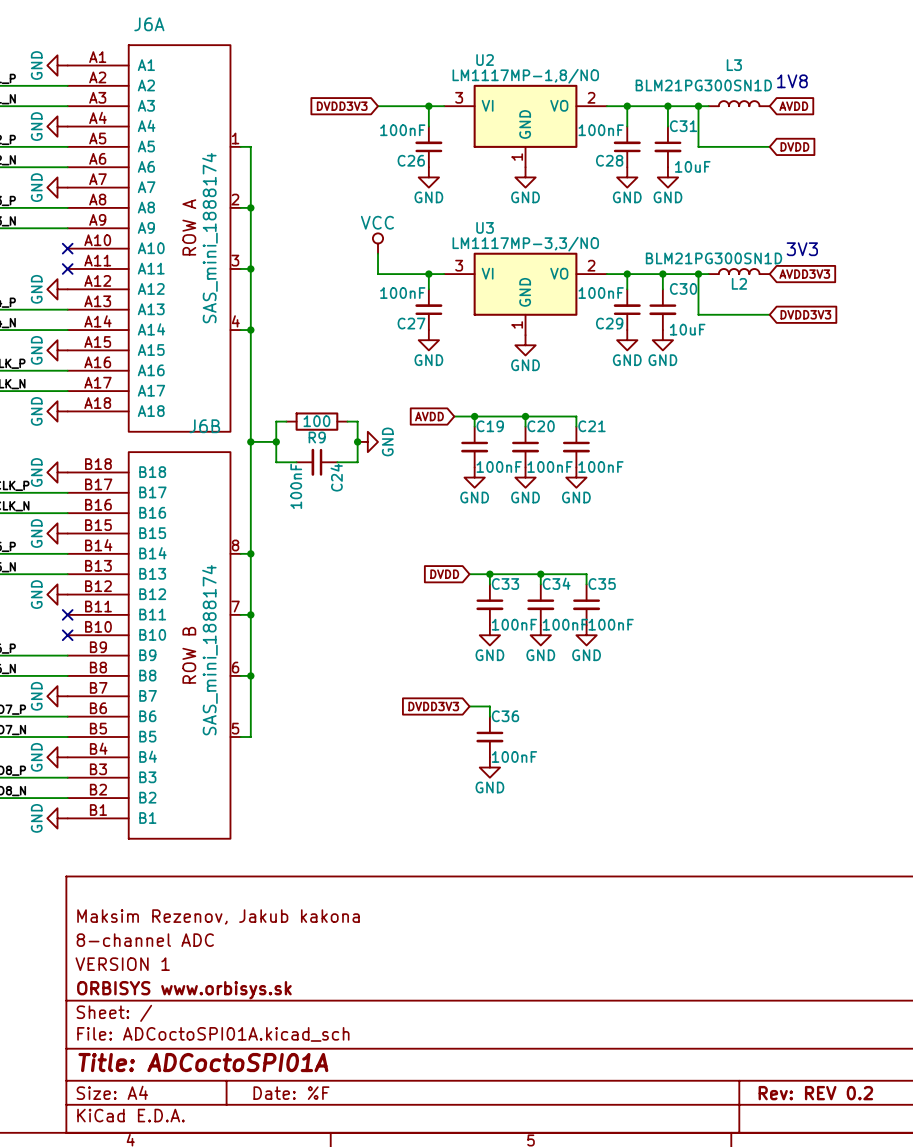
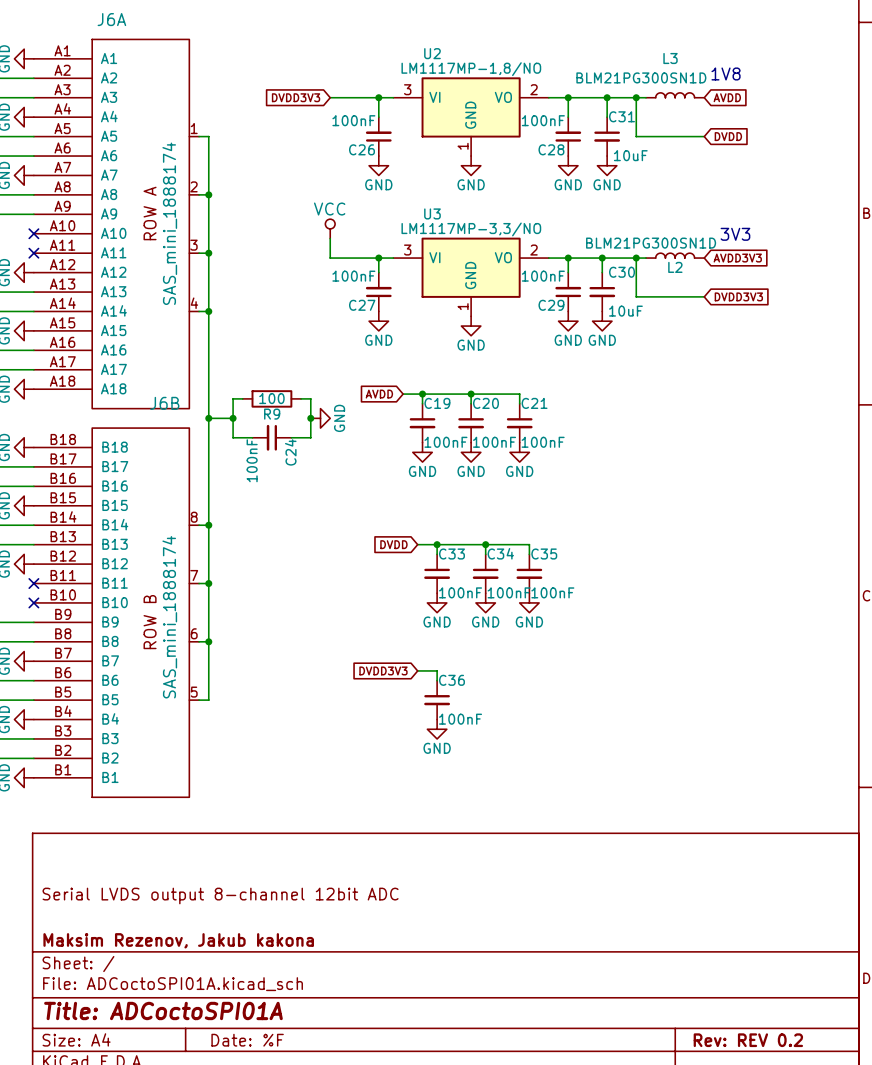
title block: Maksim Rezenov, Jakub kakona (218, 916) -> none
title block: 8-channel ADC (145, 940) -> Serial LVDS output 8-channel 12bit ADC (220, 895)
title block: VERSION 1 (122, 964) -> none
title block: ORBISYS www.orbisys.sk (184, 990) -> Maksim Rezenov, Jakub kakona (178, 940)

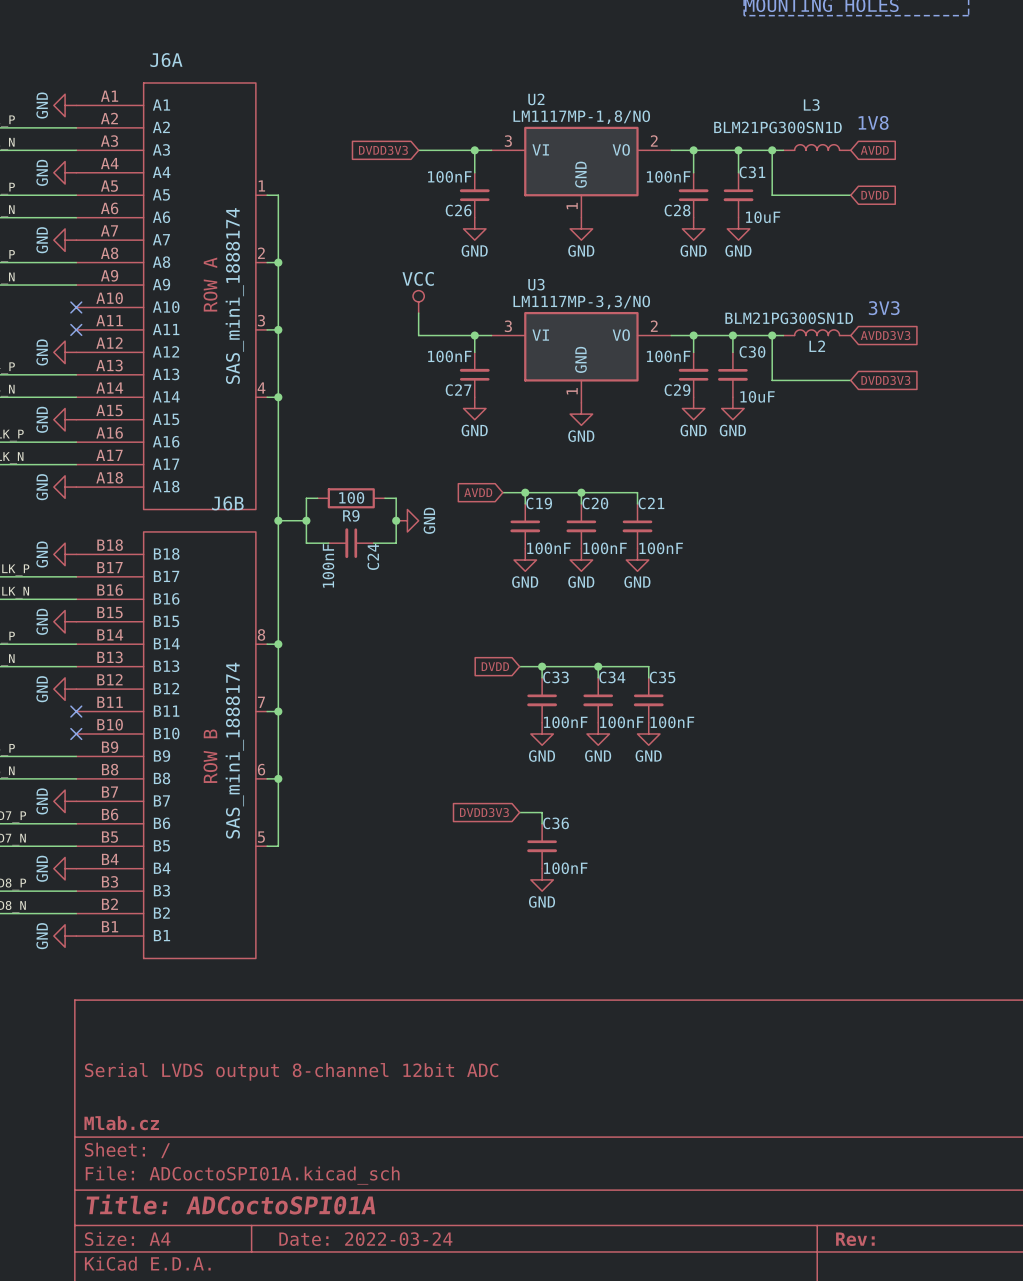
title block: Maksim Rezenov, Jakub kakona (178, 940) -> Mlab.cz (121, 1123)
title block: Date: %F (247, 1040) -> Date: 2022-03-24 (365, 1239)
title block: Rev: REV 0.2 (748, 1040) -> Rev: (855, 1239)

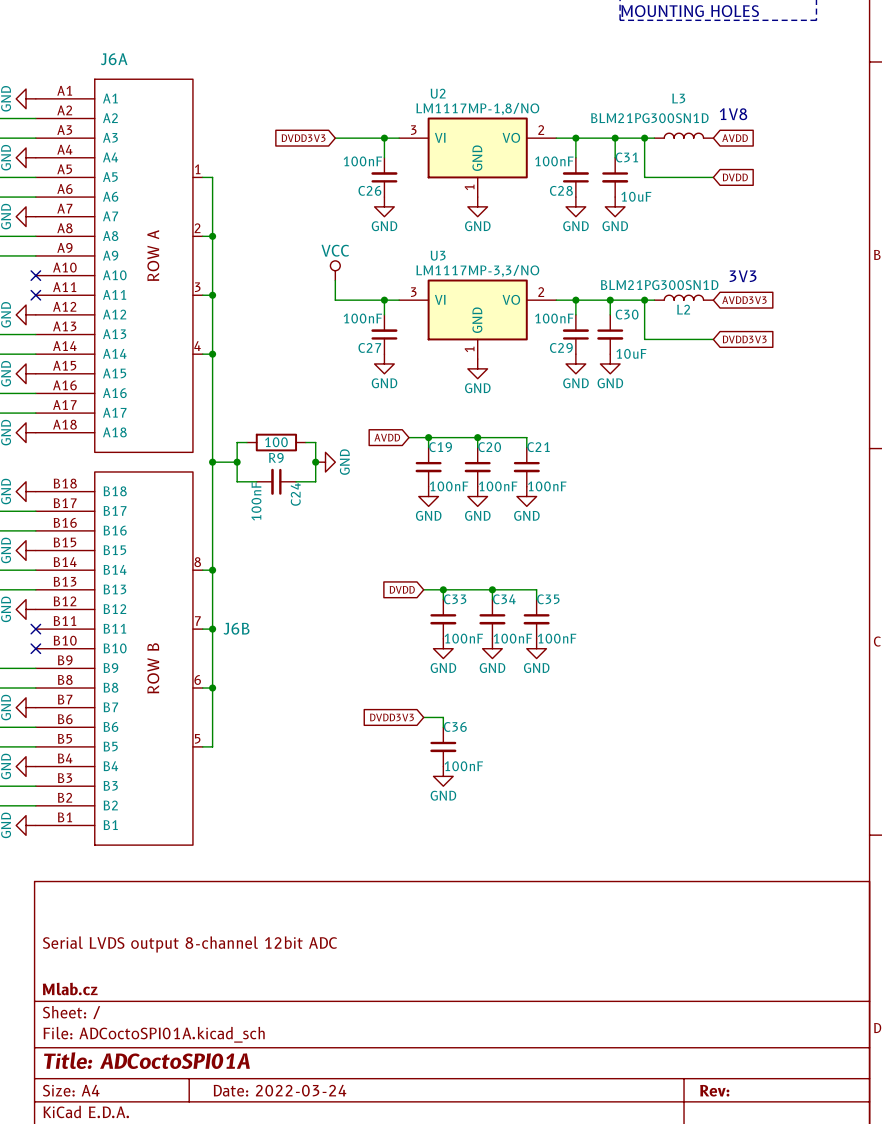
J6A value: SAS_mini_1888174 (234, 296) -> none
J6B name position: J6B (227, 503) -> J6B (236, 628)
J6B value: SAS_mini_1888174 (234, 750) -> none

